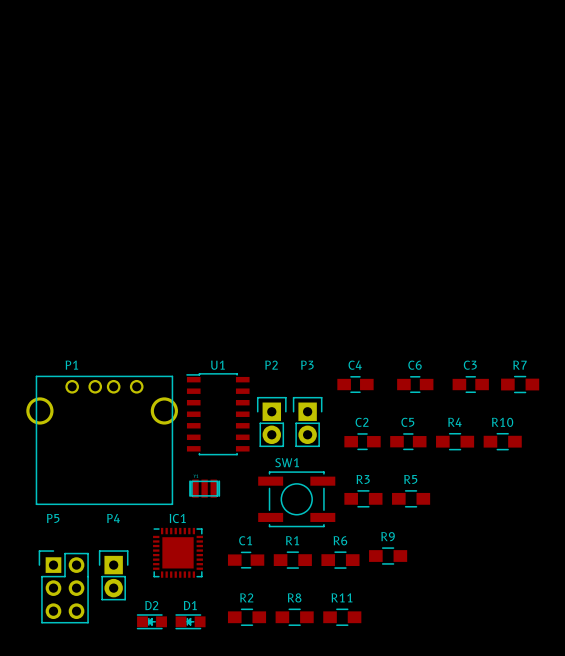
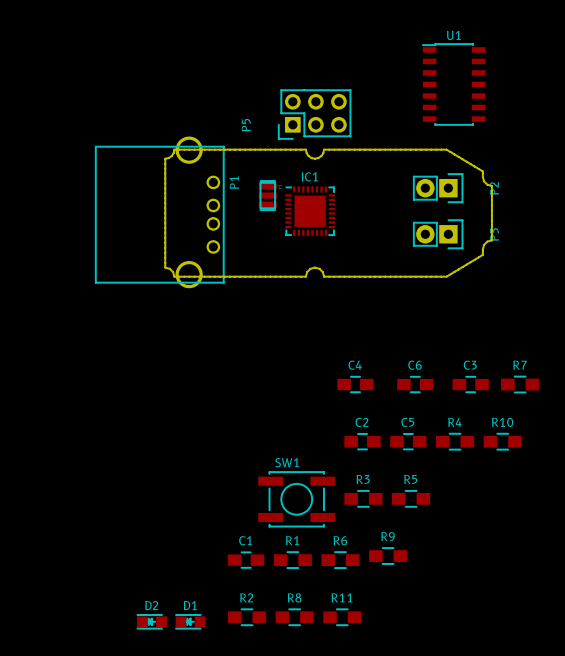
board edge: none -> (174, 149) (305, 149) (308, 156) (314, 158) (321, 156) (324, 149) (446, 149) (482, 171) (484, 181) (491, 185) (491, 240) (484, 244) (482, 254) (446, 276) (324, 276) (319, 268) (314, 267) (307, 272) (305, 276) (174, 276) (169, 268) (165, 267) (165, 158) (171, 156) (174, 149)
U1 position: (217, 414) -> (453, 84)
P2 rotation: 0° (271, 422) -> 90° clockwise (438, 188)
P2 position: (271, 422) -> (438, 188)
P3 rotation: 0° (307, 422) -> 90° clockwise (438, 234)
P3 position: (307, 422) -> (438, 234)
P1 rotation: 0° (102, 440) -> 90° clockwise (159, 212)
P1 position: (102, 440) -> (159, 212)
part rotation: 0° (204, 488) -> 90° clockwise (267, 195)
part position: (204, 488) -> (267, 195)
IC1 position: (178, 552) -> (310, 211)
P4: (113, 575) -> none
P5 rotation: 0° (63, 586) -> 90° counterclockwise (314, 114)
P5 position: (63, 586) -> (314, 114)

